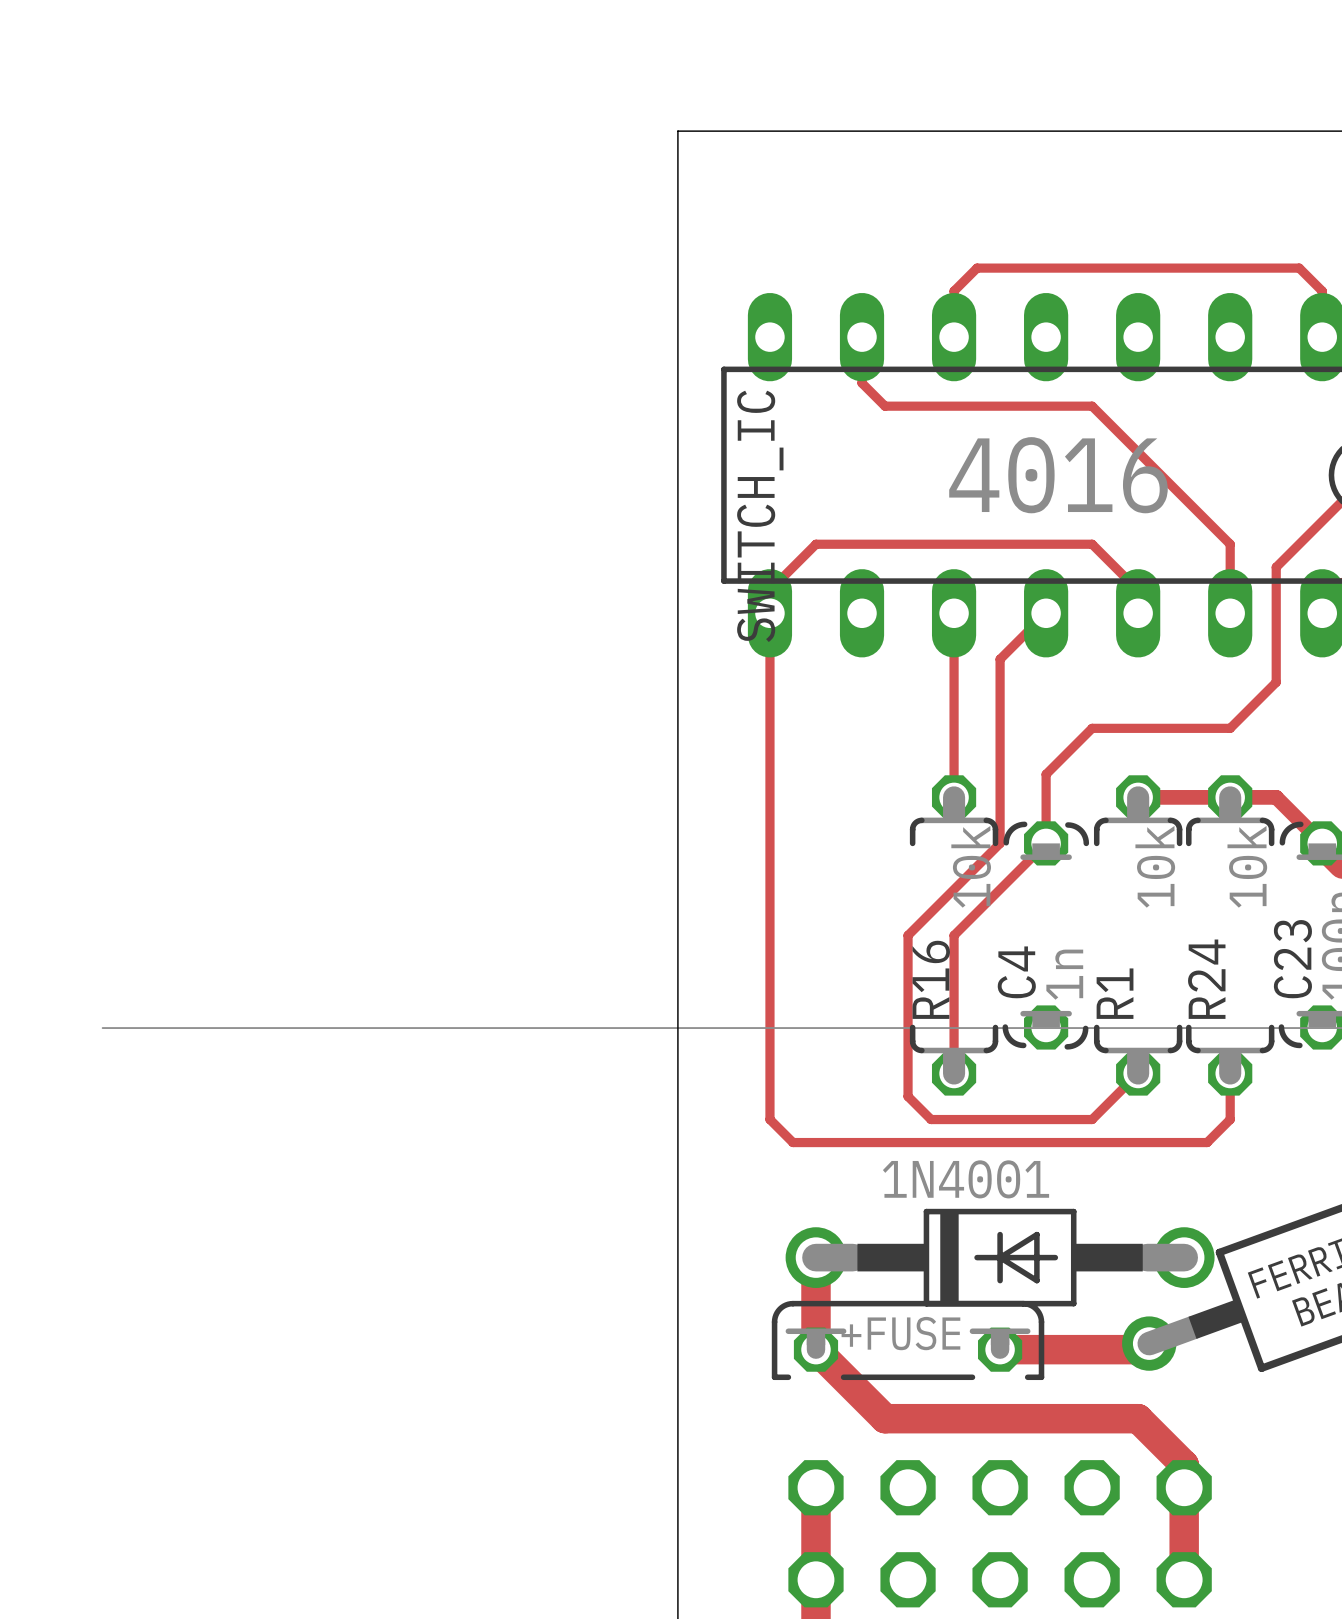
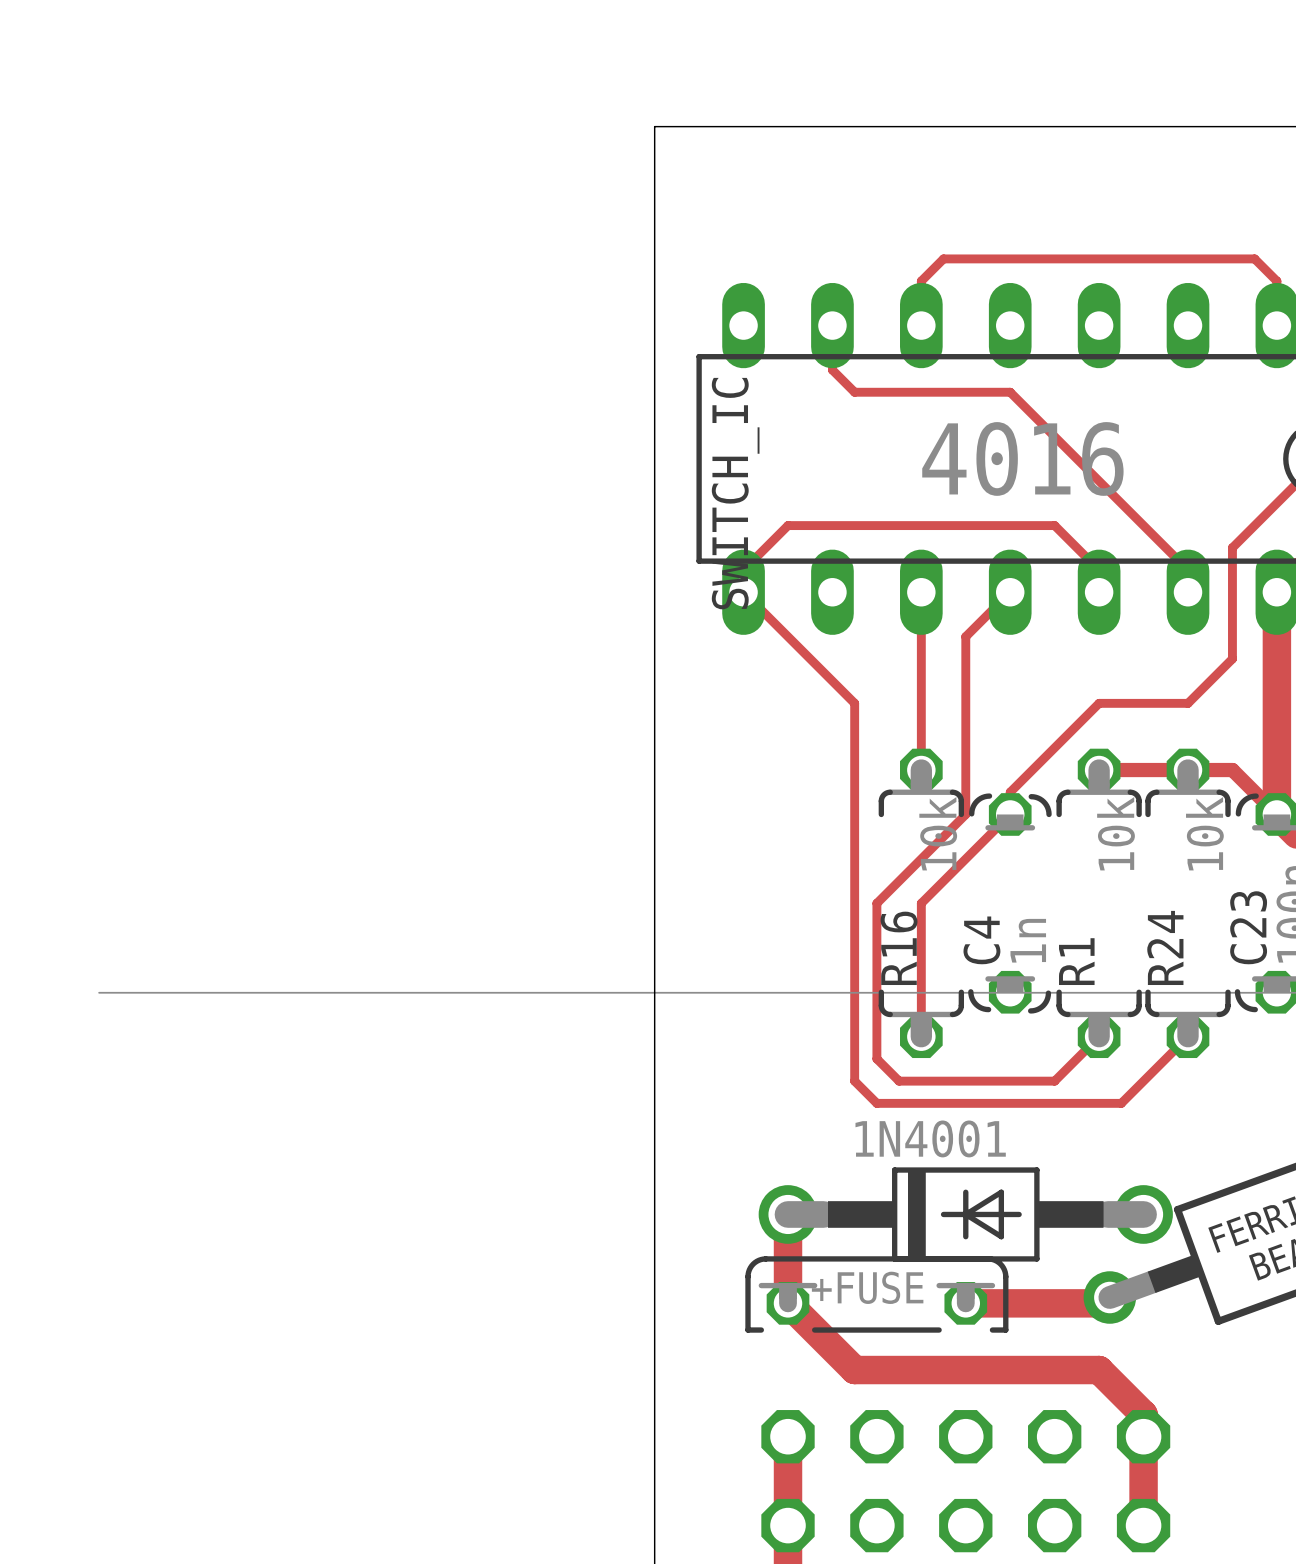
track: (1046, 406) (1092, 406) (1230, 544) (1230, 590) -> (1010, 392) (1188, 570)
track: (769, 613) (769, 1119) (792, 1142) (908, 1142) -> (743, 592) (854, 703) (854, 1081) (876, 1103)
track: none -> (1276, 592) (1276, 814)
track: (1138, 728) (1092, 728) (1046, 774) (1046, 820) -> (1099, 703) (1010, 792)
track: (1230, 1073) (1230, 1119) (1207, 1142) (1161, 1142) -> (1188, 1036) (1121, 1103)

